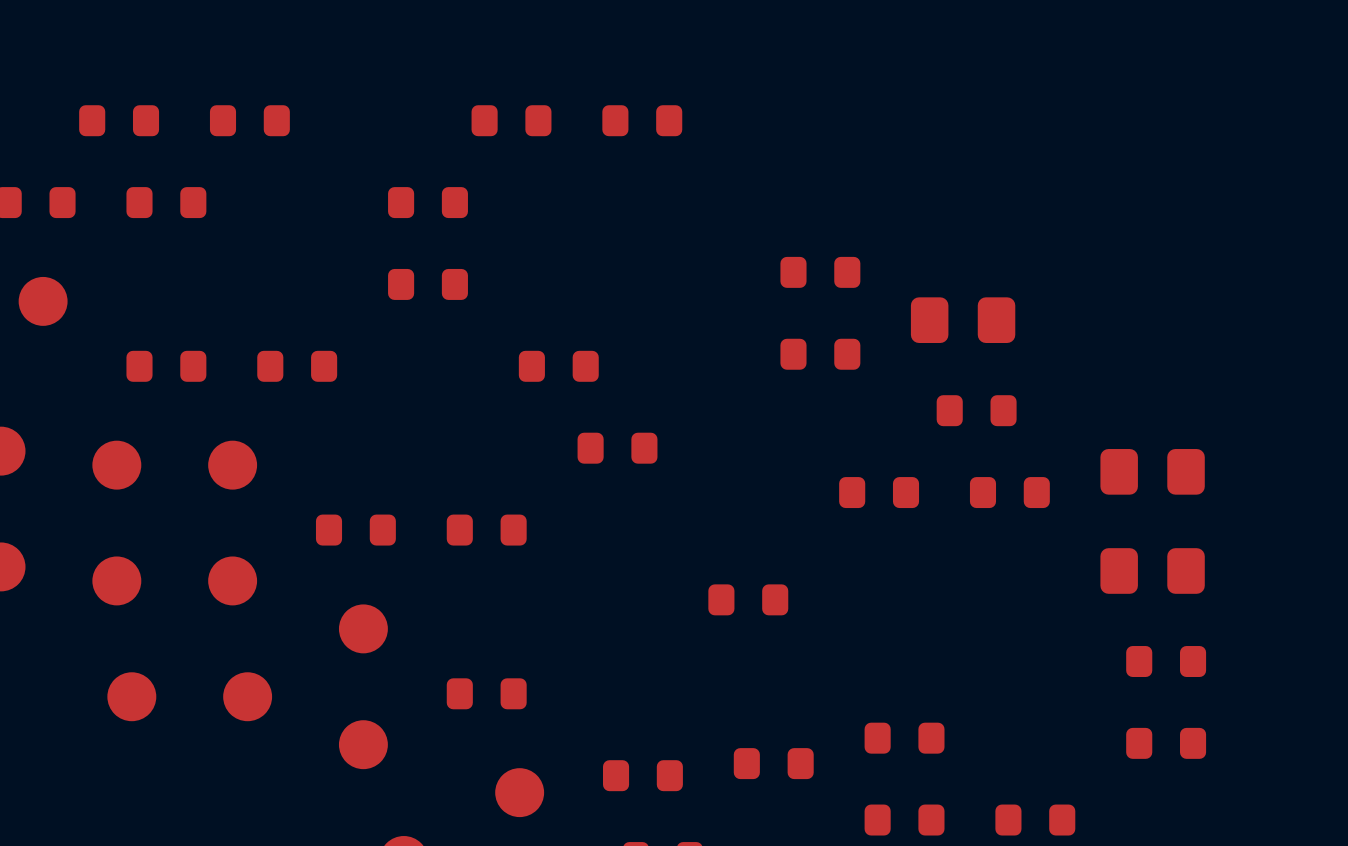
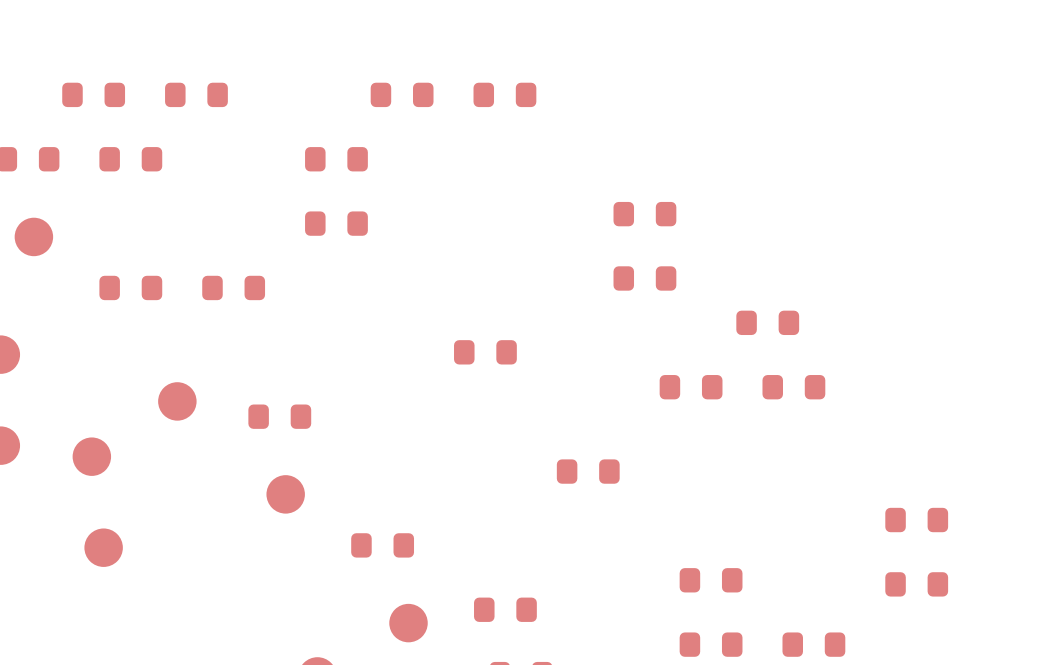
part: (963, 320) -> none
part: (558, 366) -> none
part: (116, 465) -> none
part: (232, 465) -> none
part: (1152, 471) -> none
part: none -> (177, 401)
part: (486, 530) -> none
part: (1152, 570) -> none
part: (232, 580) -> none
part: (247, 696) -> none
part: (363, 744) -> none
part: (773, 763) -> none

